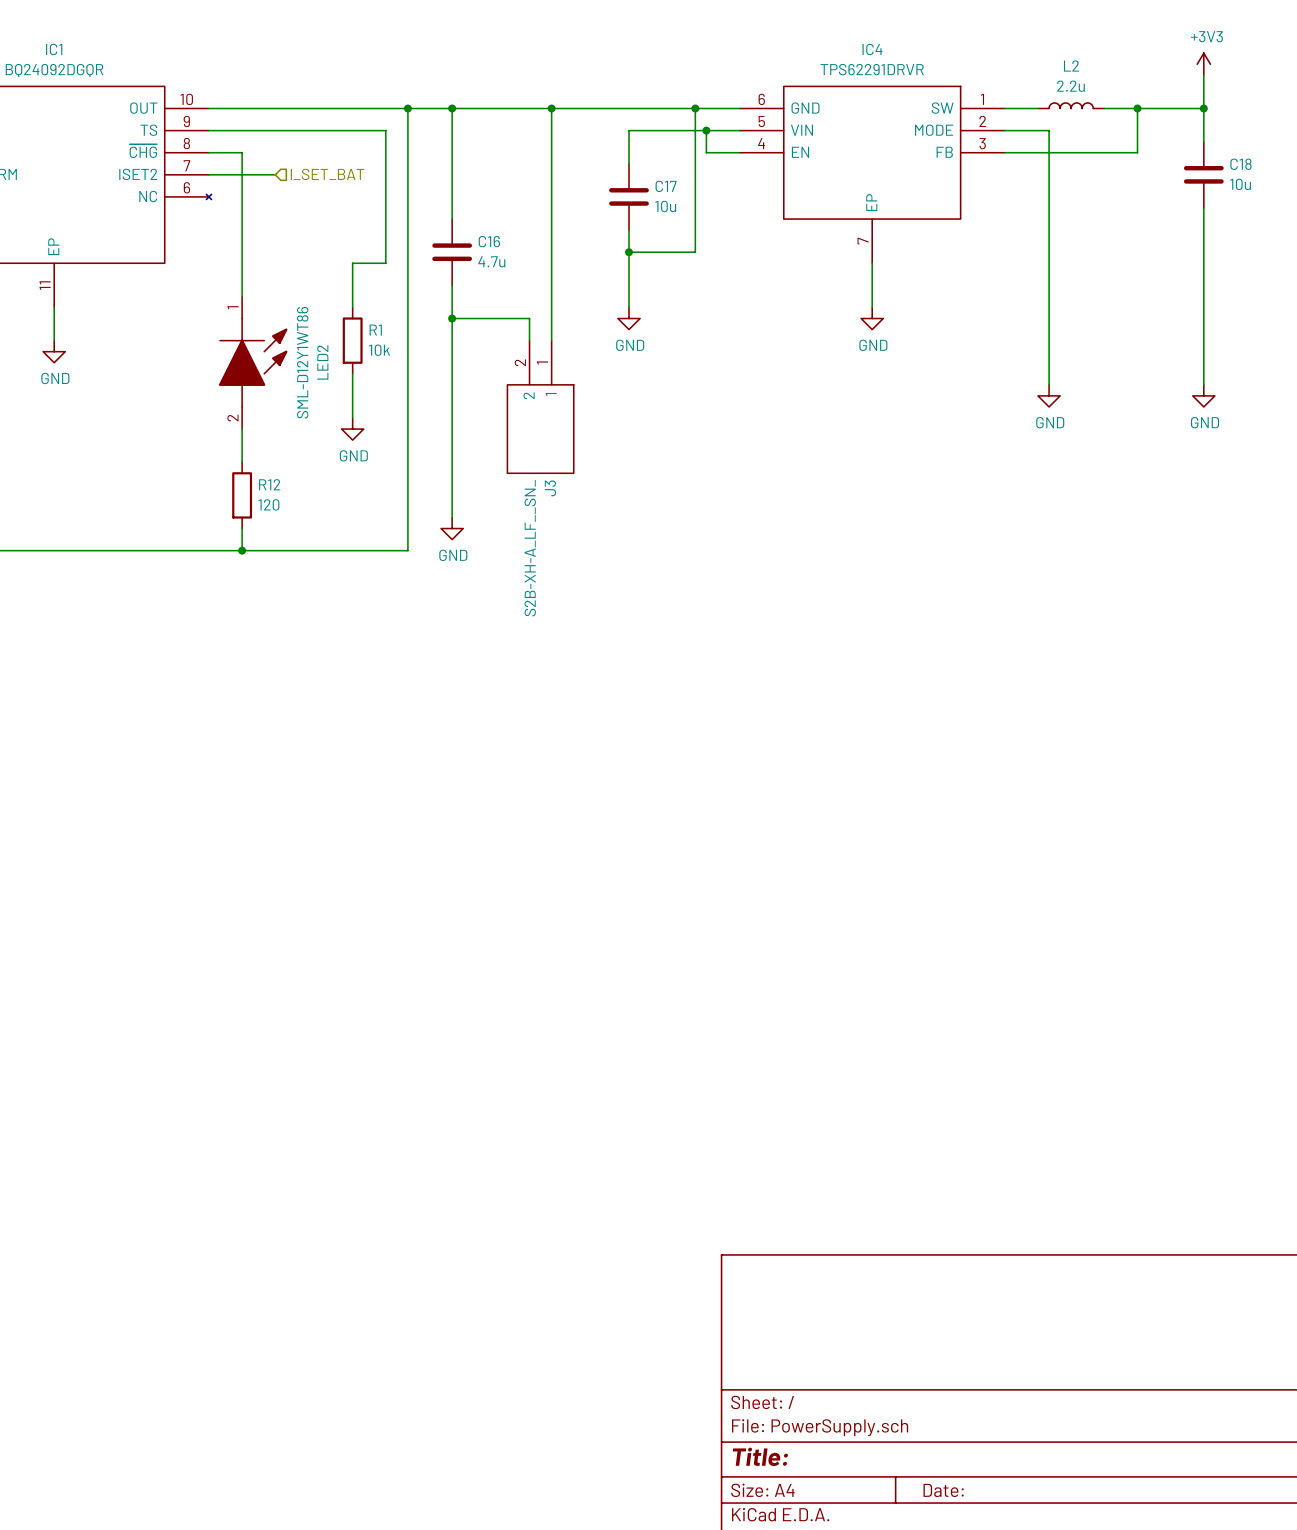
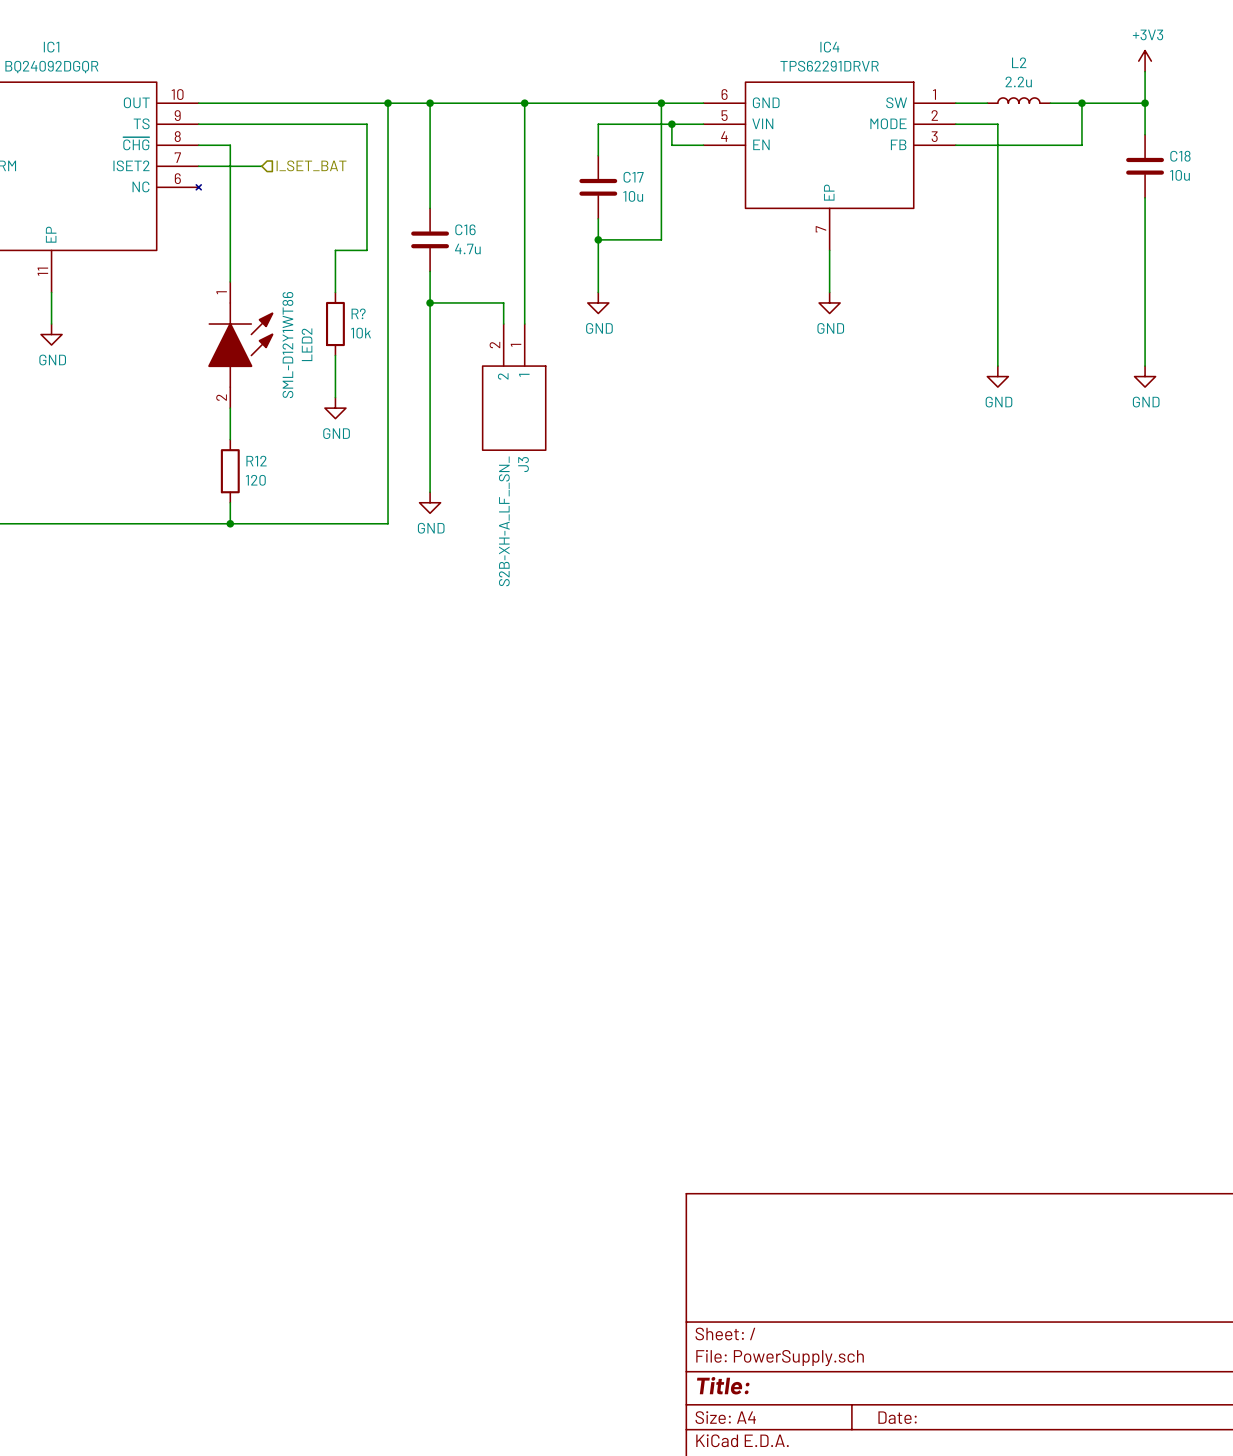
R1 name: R1 (375, 330) -> R? (358, 313)

